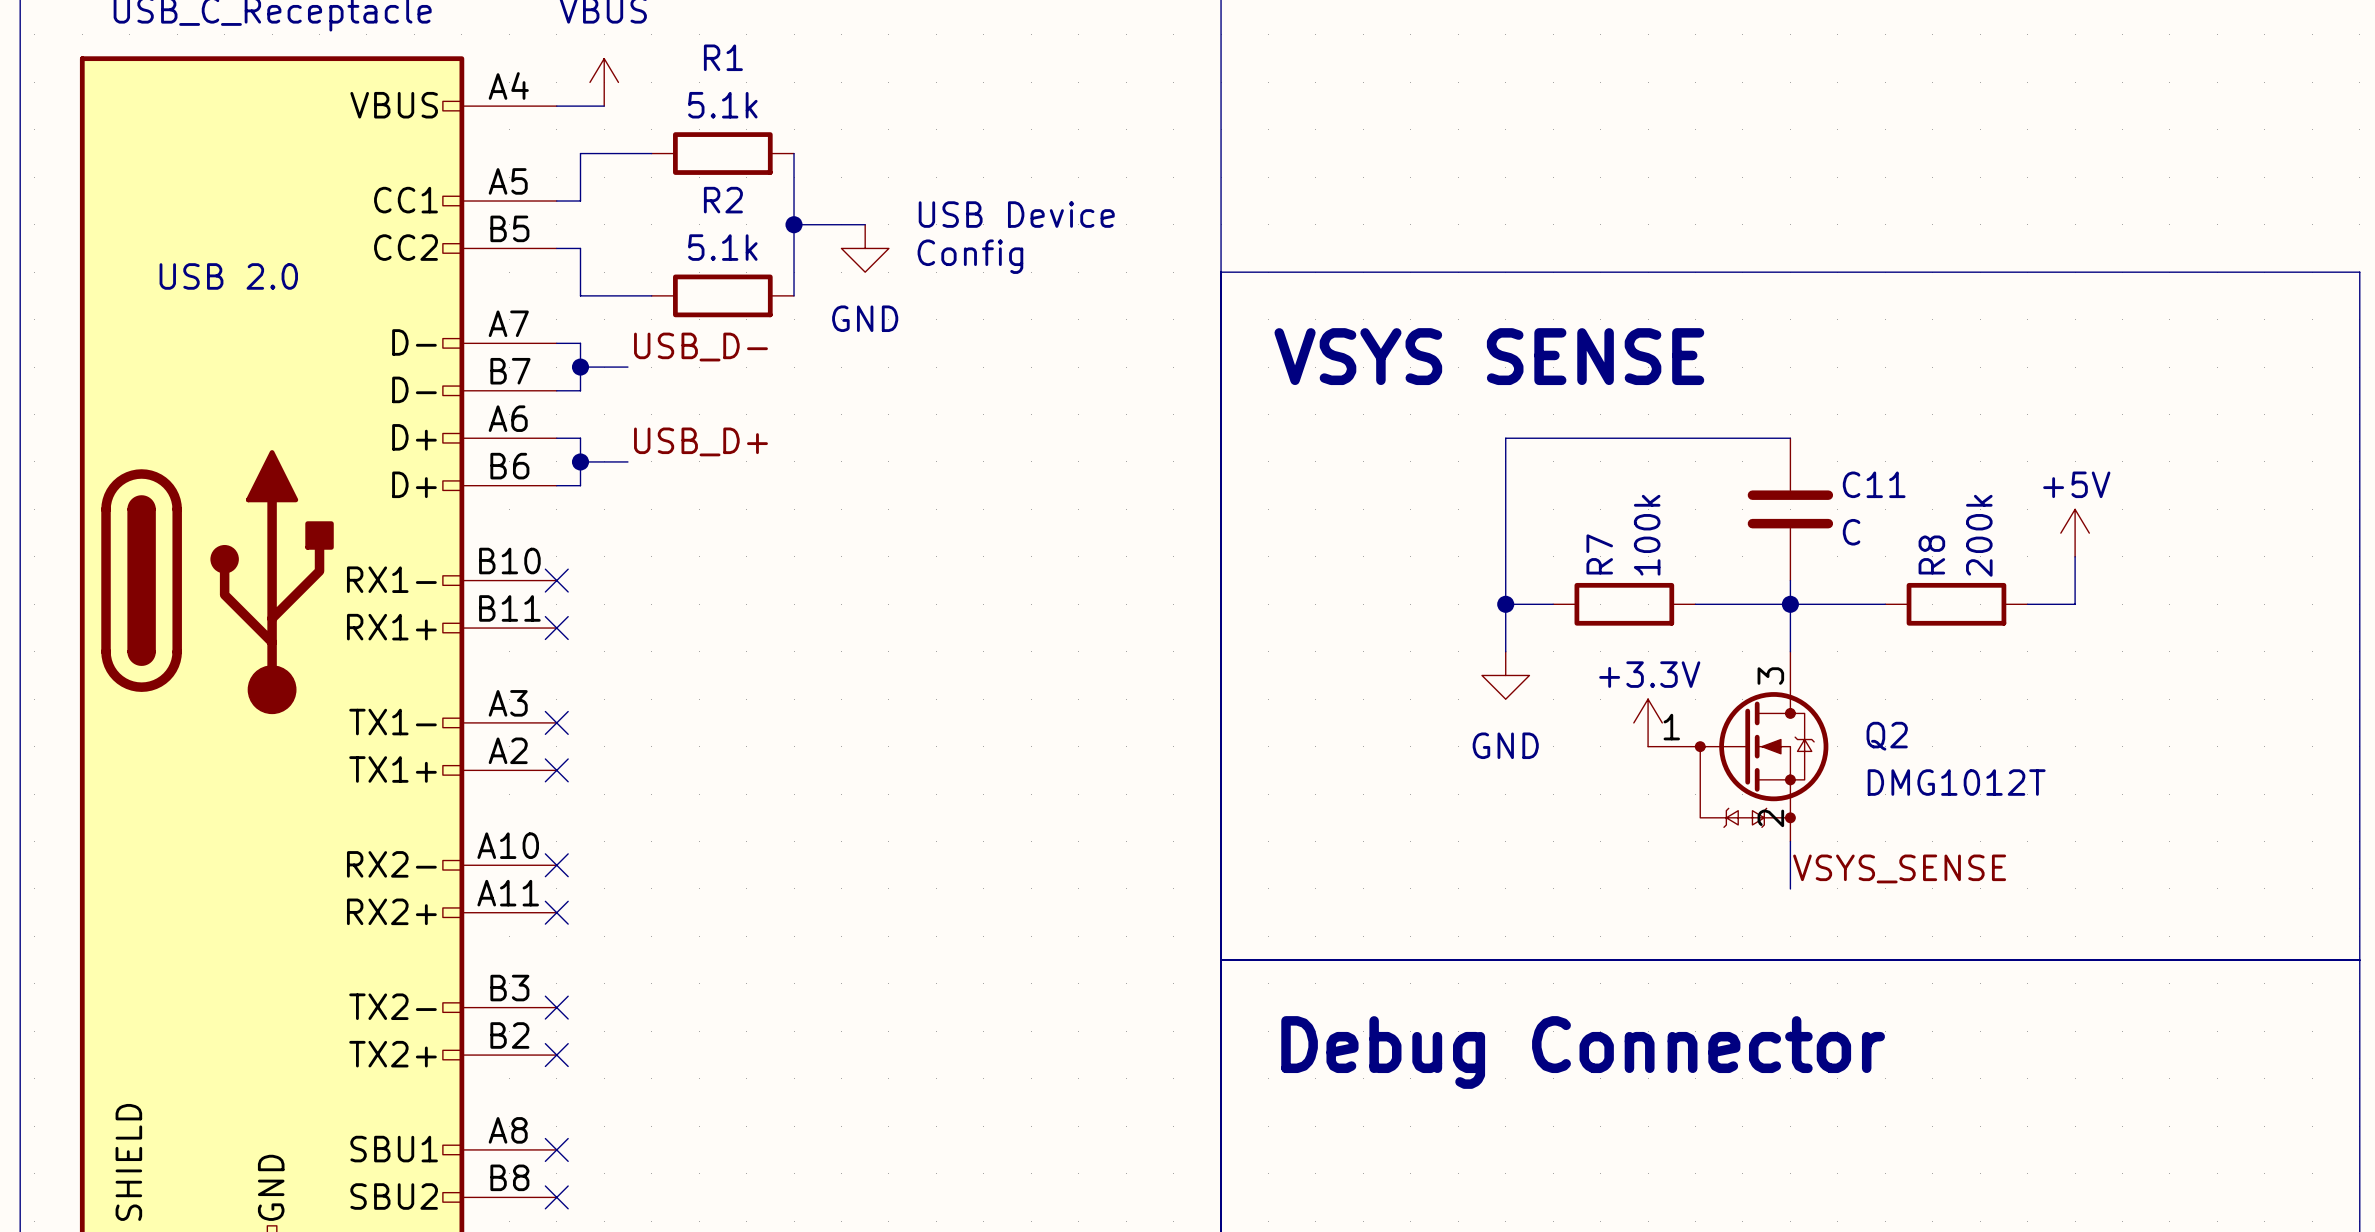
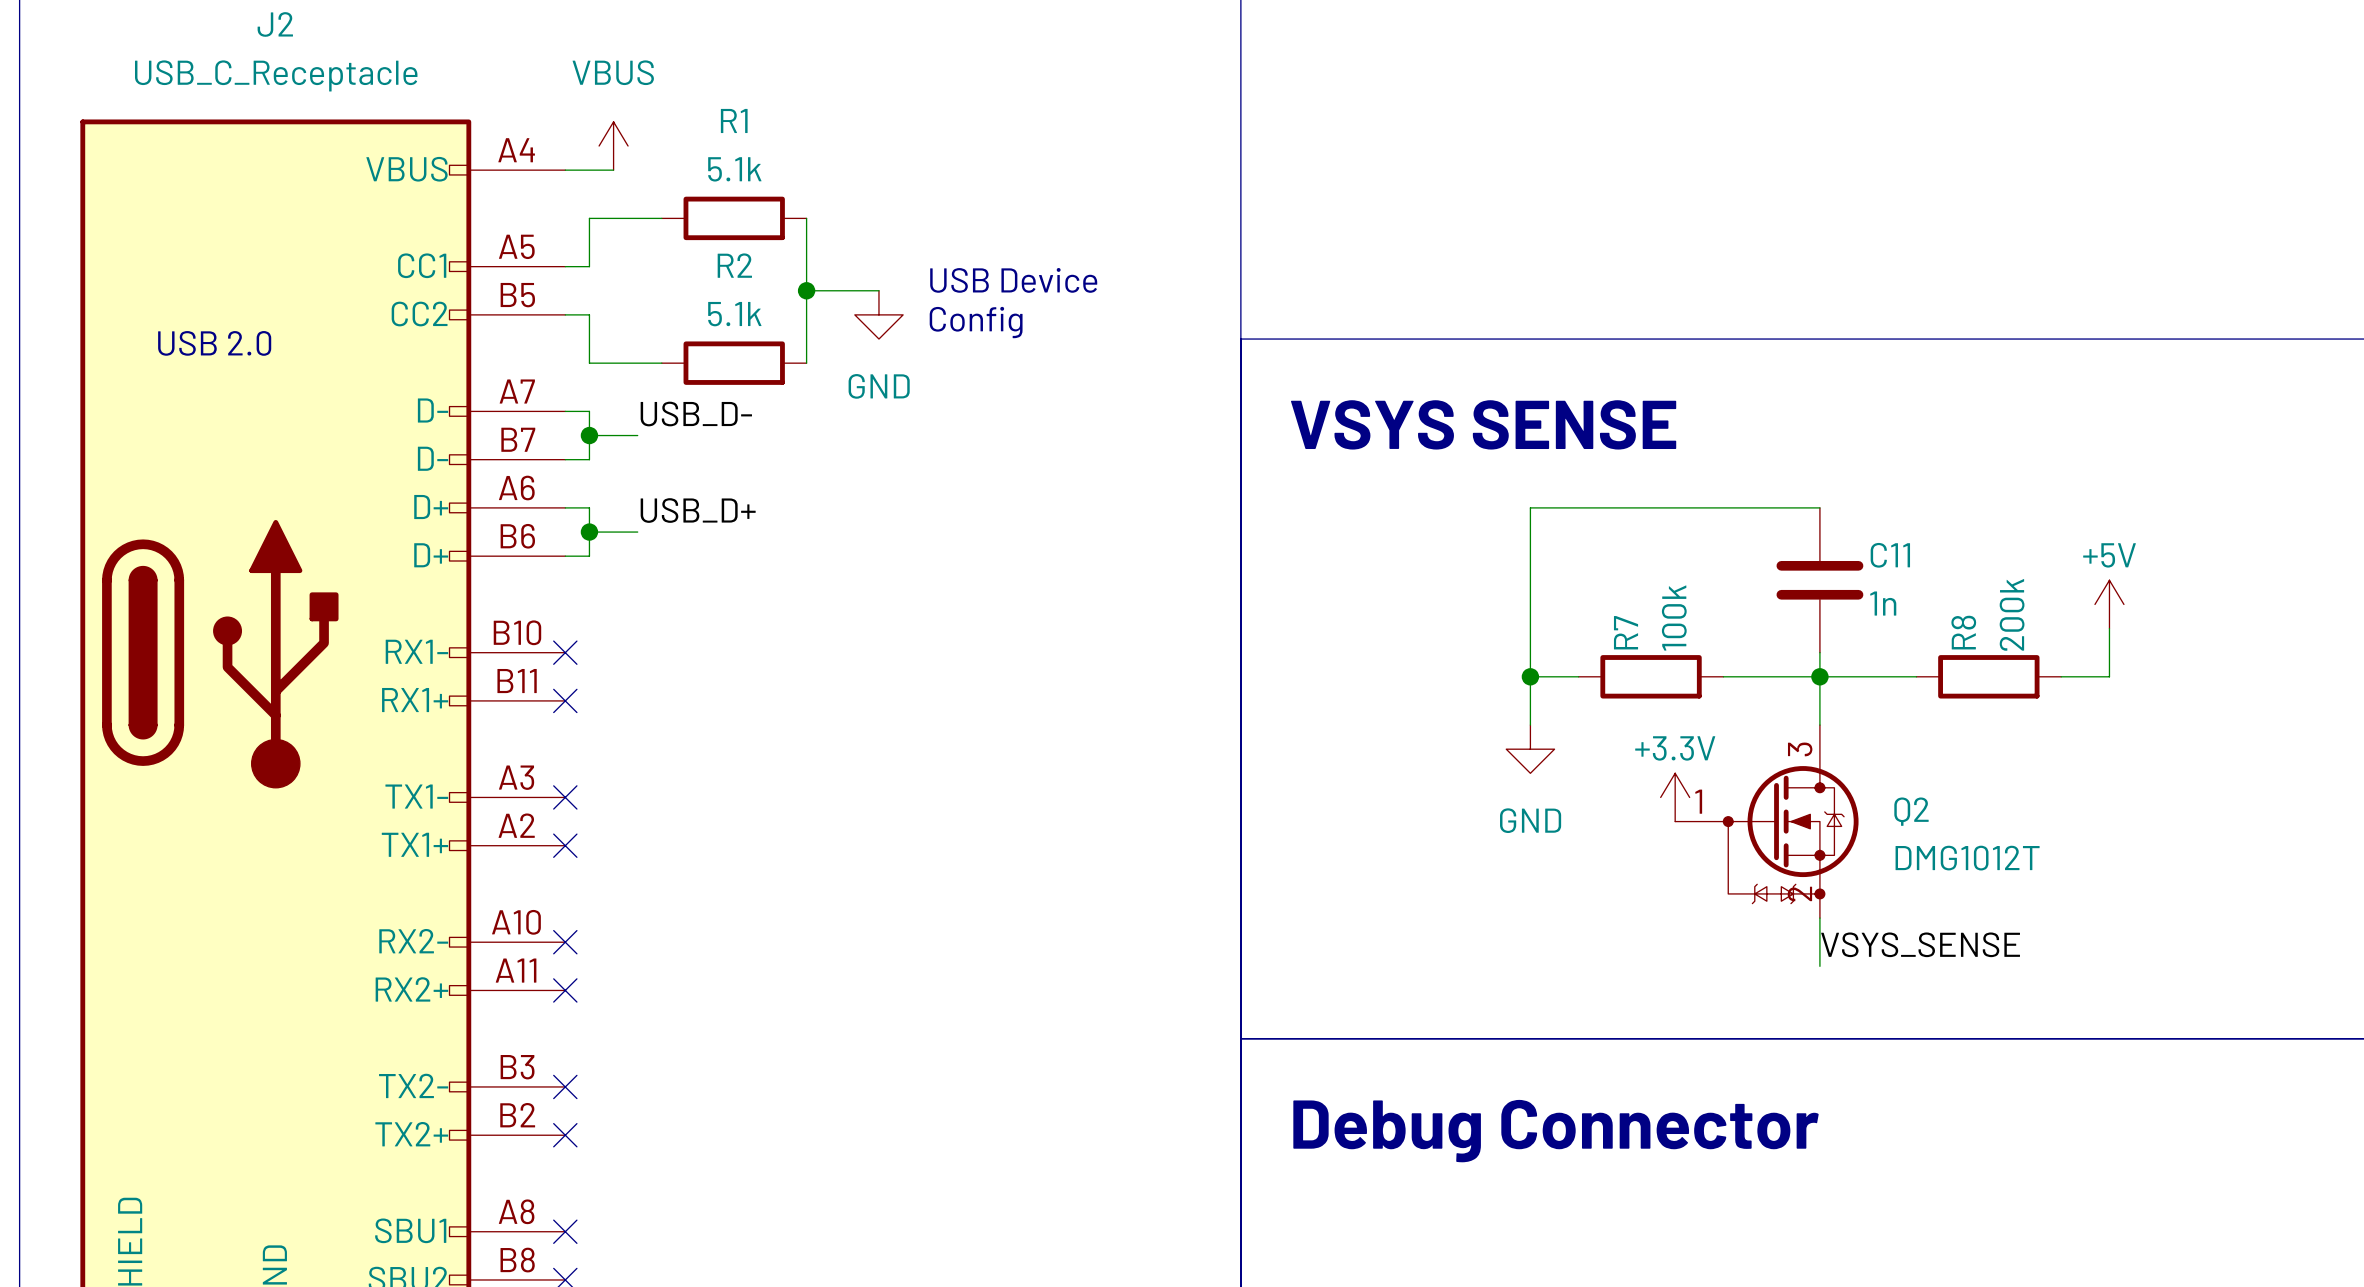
C11 value: C (1851, 532) -> 1n (1883, 603)

